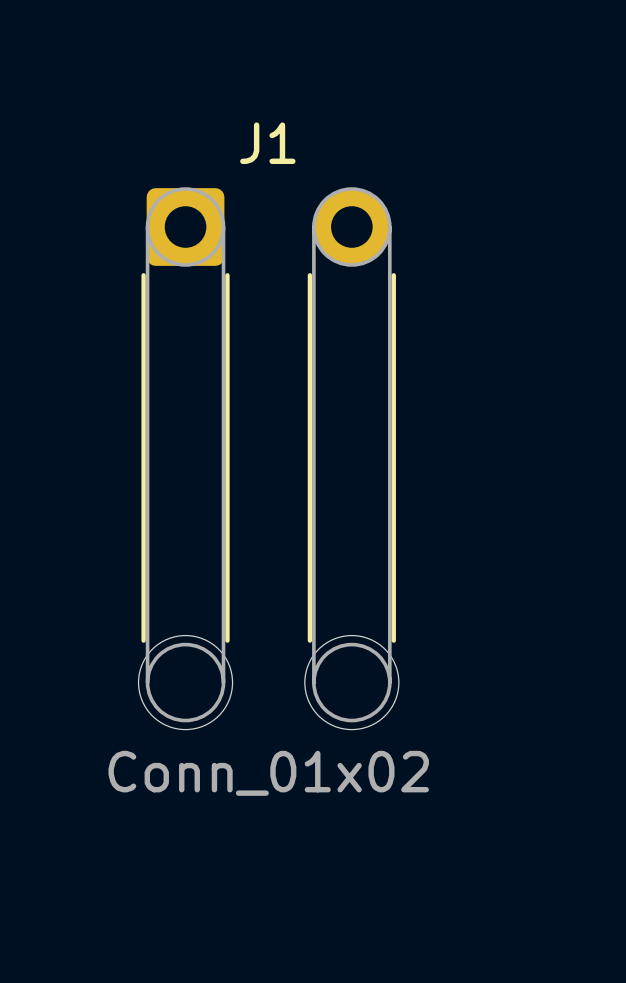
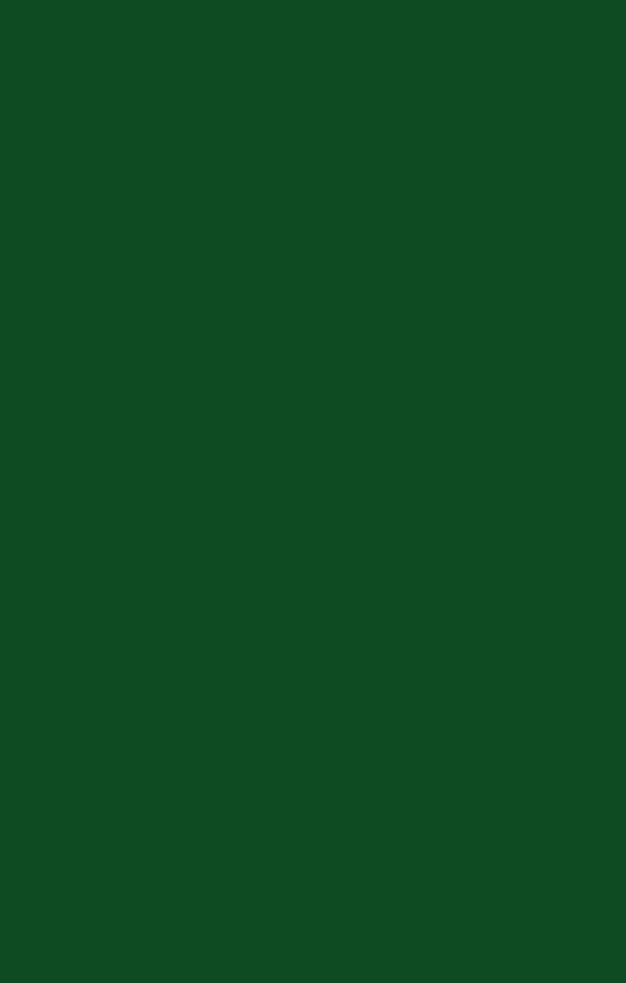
J1: Conn_01x02 (268, 458) -> none

